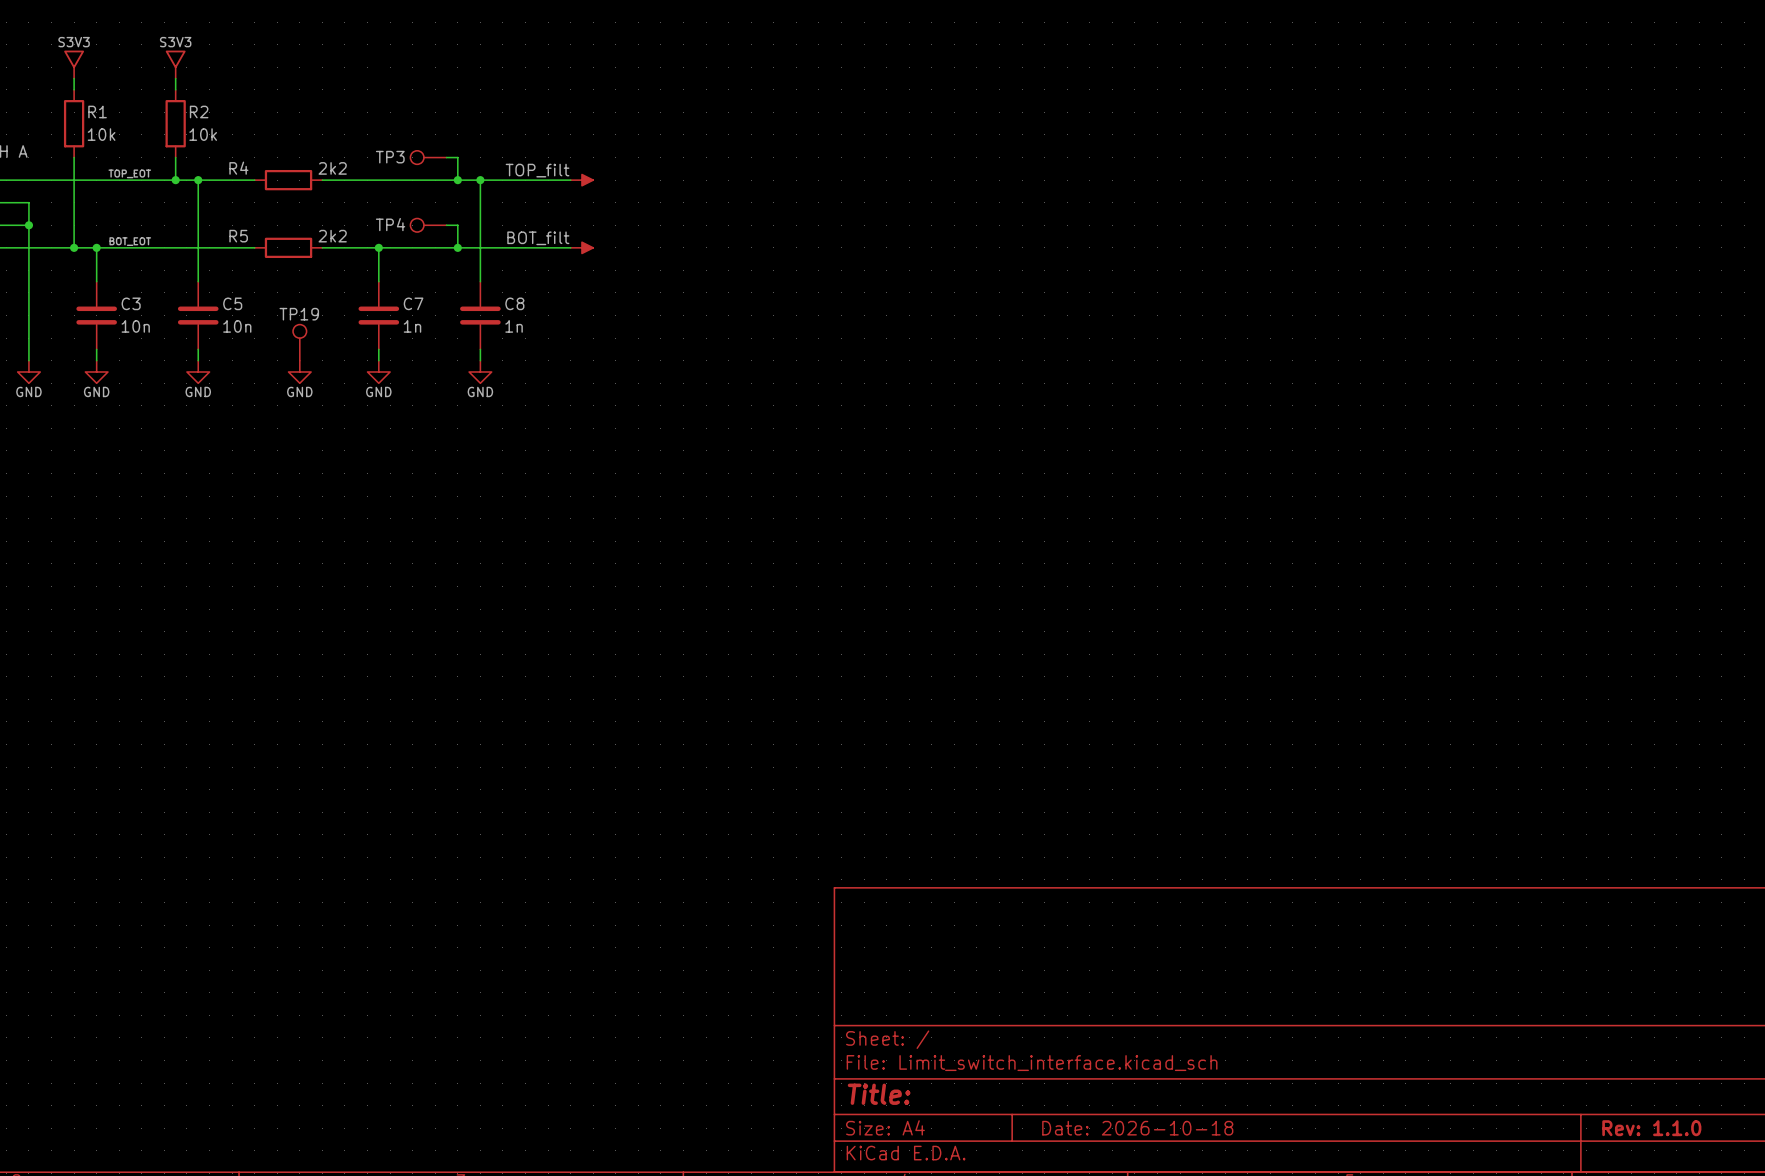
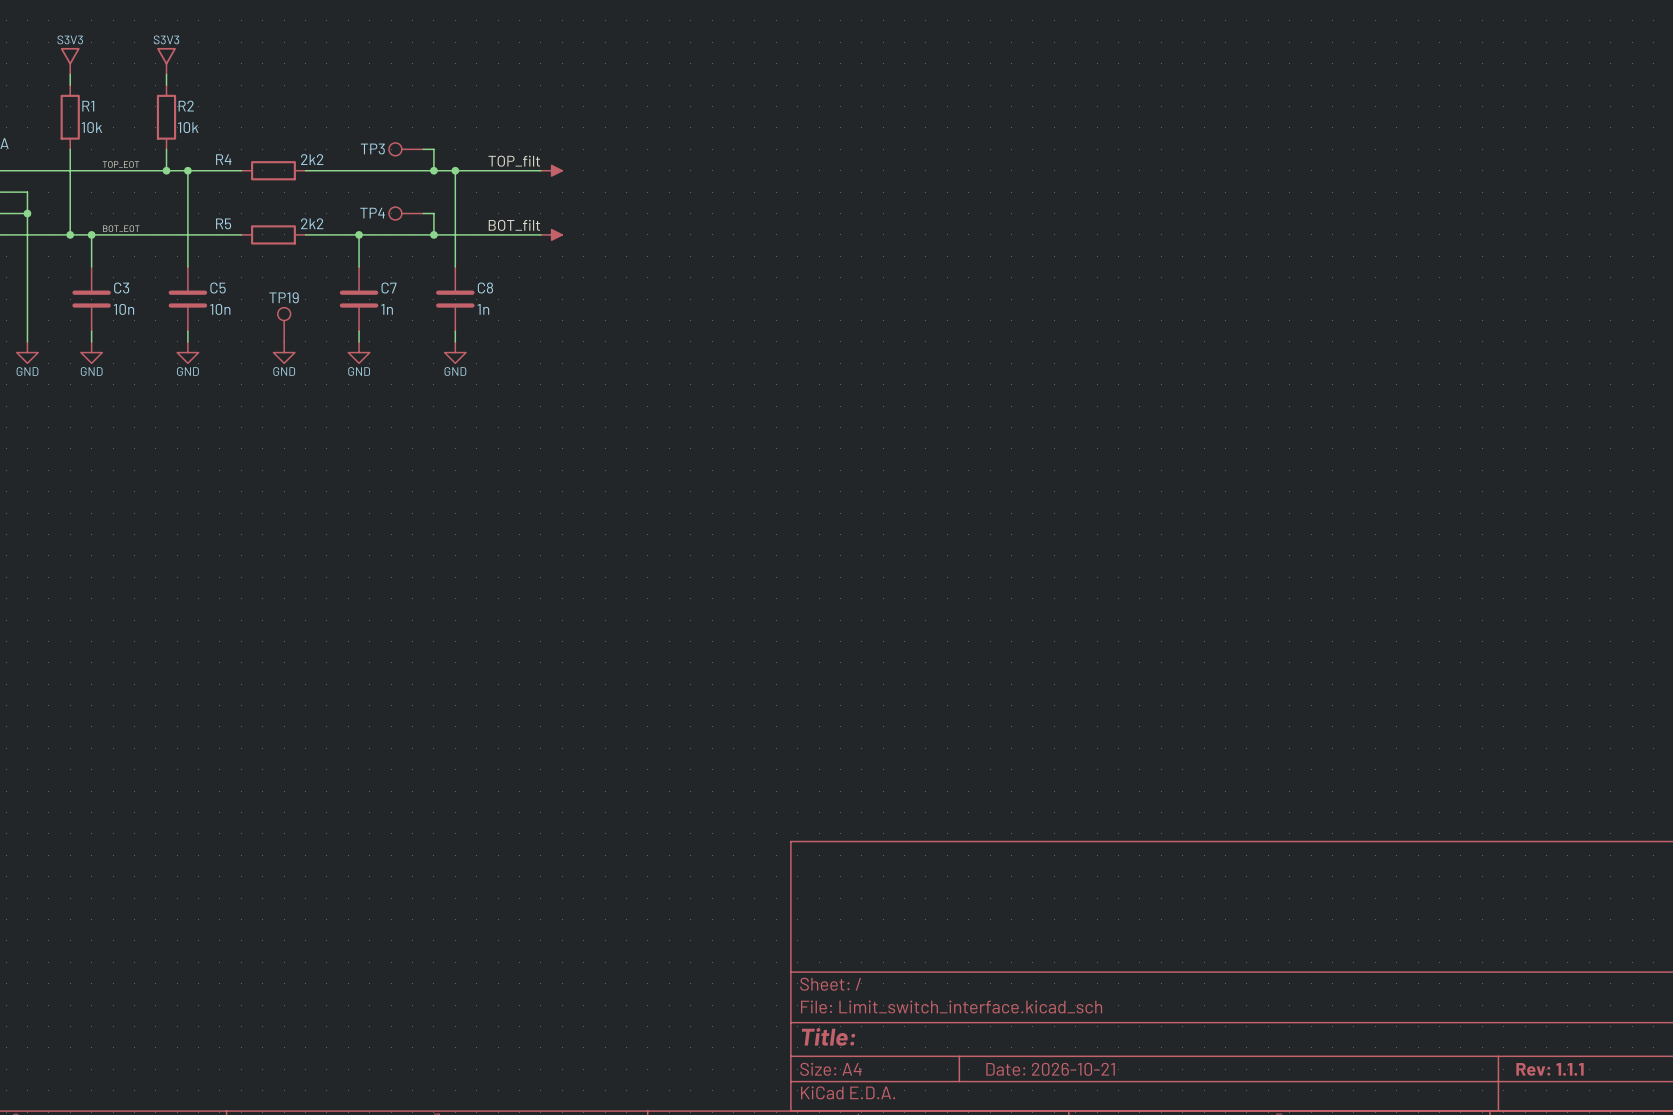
title block: Date: 2026-10-18 (1137, 1128) -> Date: 2026-10-21 (1050, 1069)
title block: Rev: 1.1.0 (1651, 1128) -> Rev: 1.1.1 (1550, 1069)

